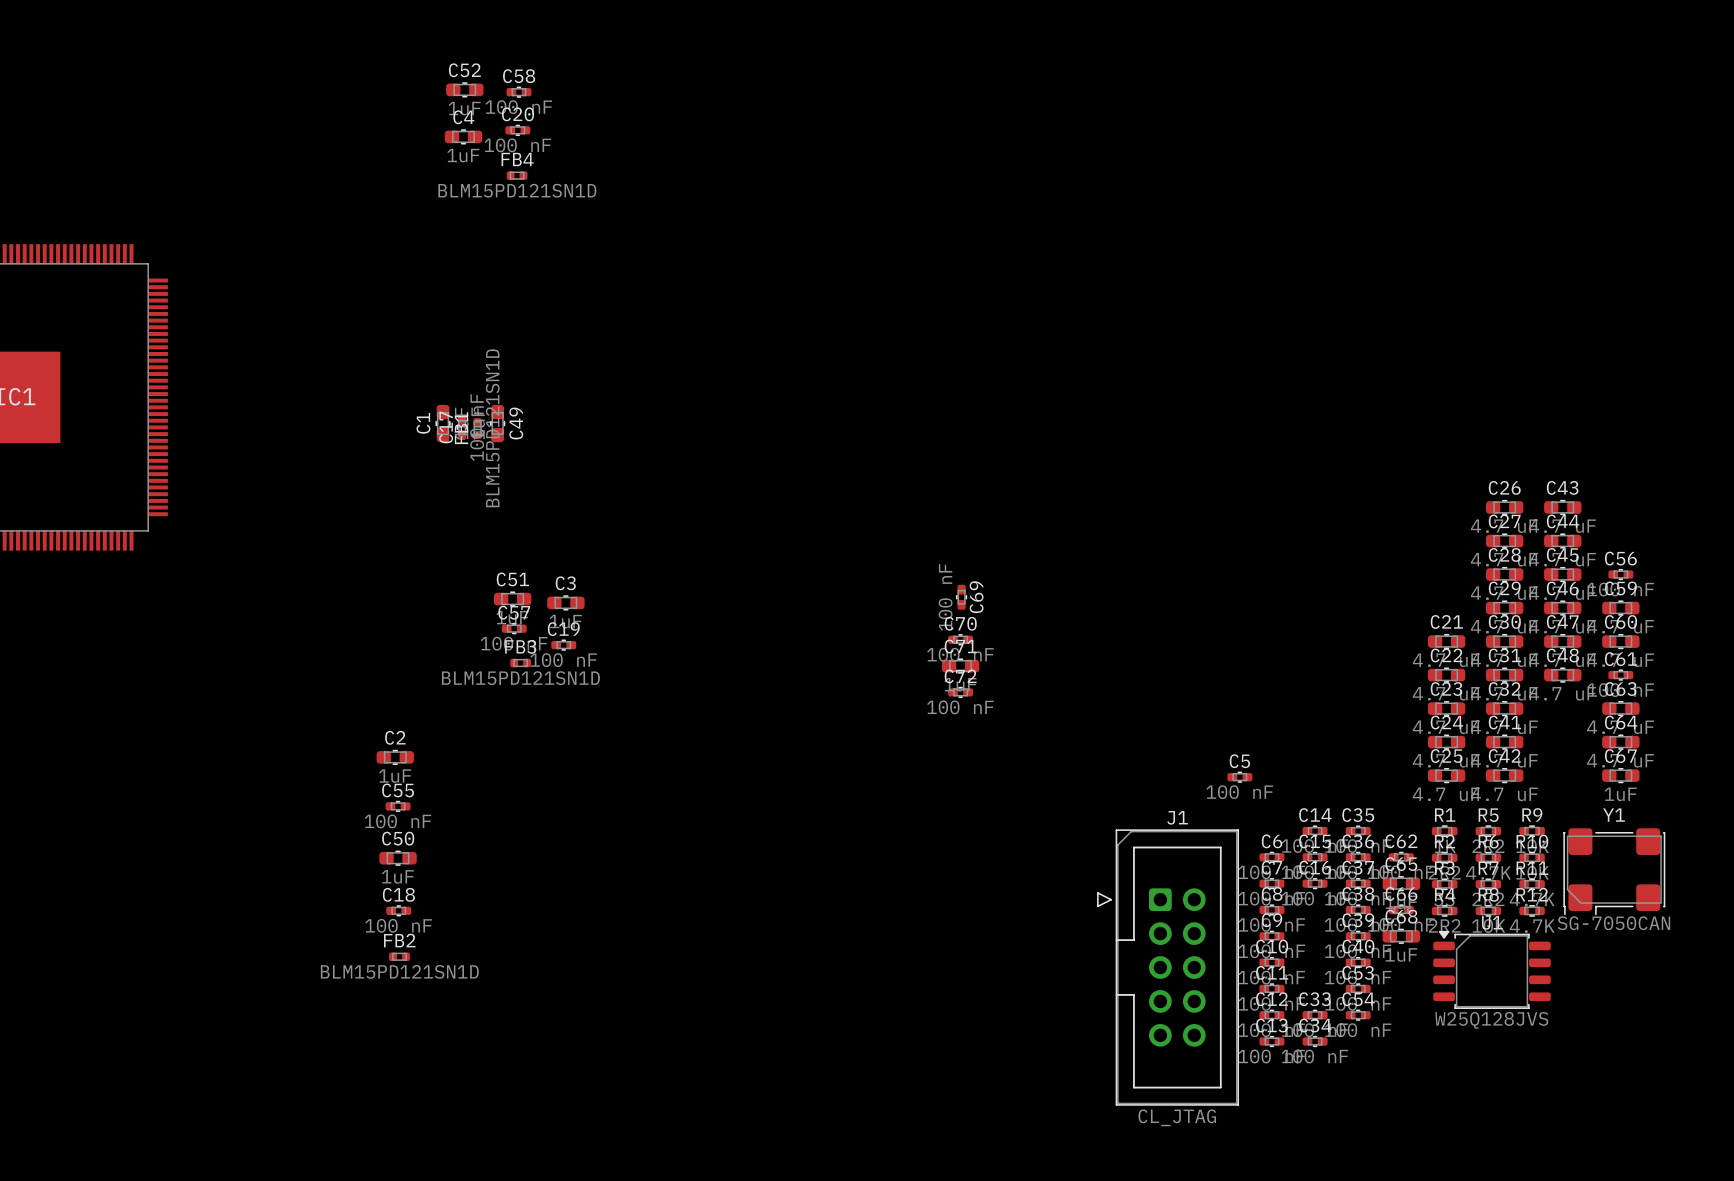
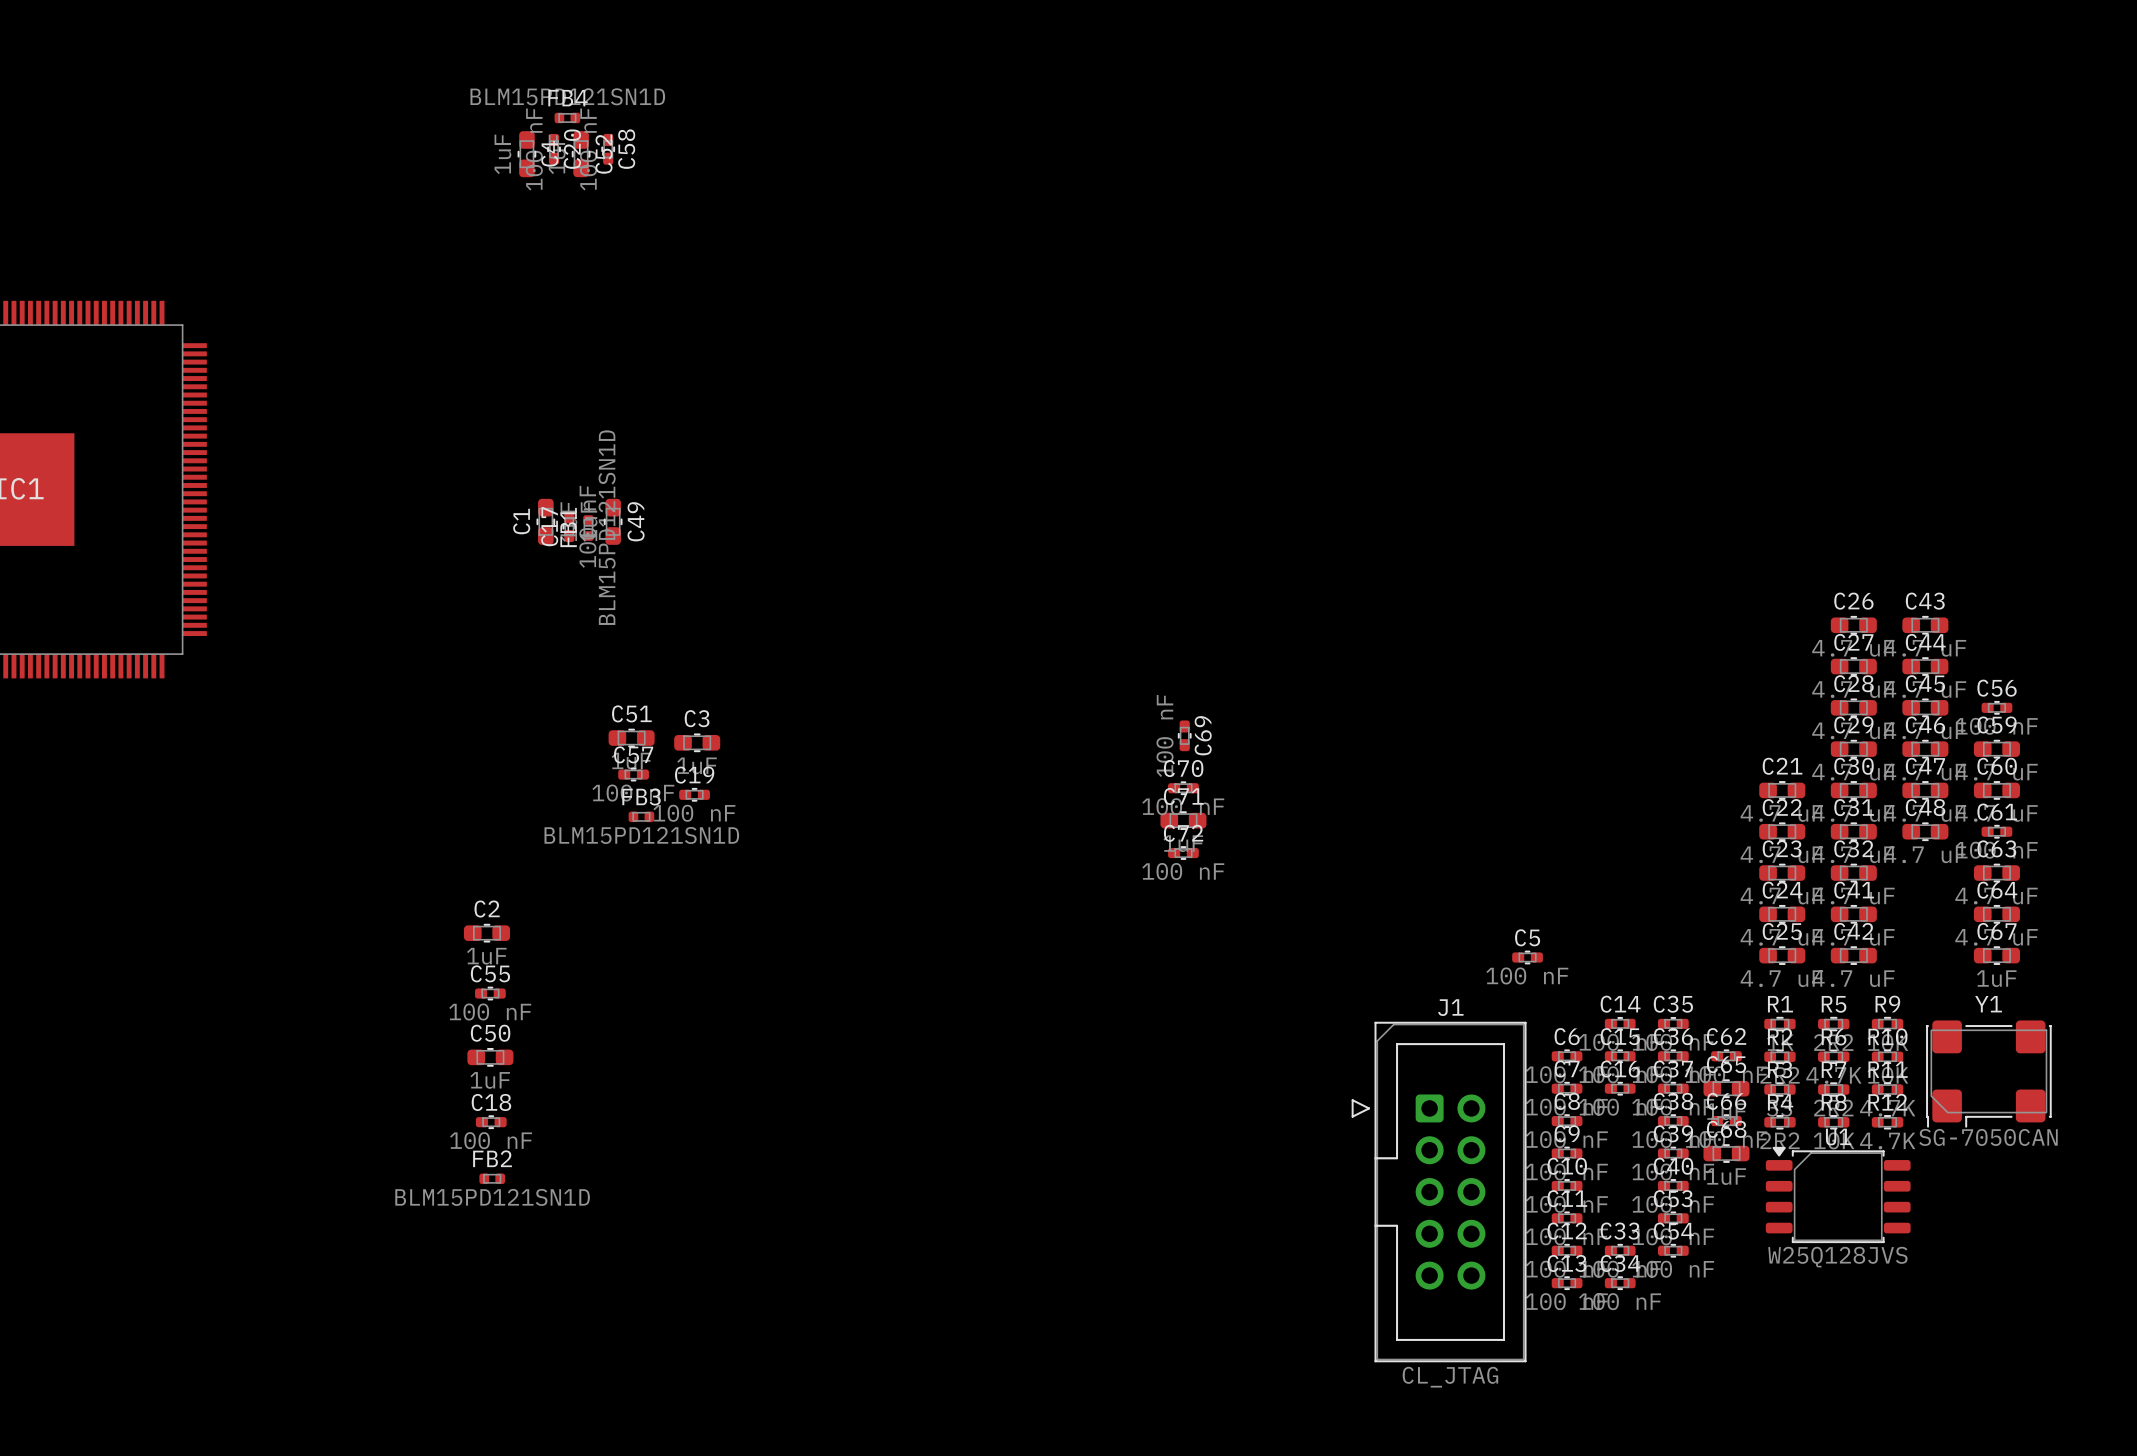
C52 rotation: 0° (464, 89) -> 90° clockwise (581, 154)
C52 position: (464, 89) -> (581, 154)
C58 rotation: 0° (518, 92) -> 90° clockwise (608, 149)
C58 position: (518, 92) -> (608, 149)
C20 rotation: 0° (517, 130) -> 90° clockwise (554, 149)
C20 position: (517, 130) -> (554, 149)
C4 rotation: 0° (463, 136) -> 90° clockwise (526, 154)
C4 position: (463, 136) -> (526, 154)
FB4 position: (517, 175) -> (567, 117)
FB4 value position: BLM15PD121SN1D (517, 190) -> BLM15PD121SN1D (567, 96)

